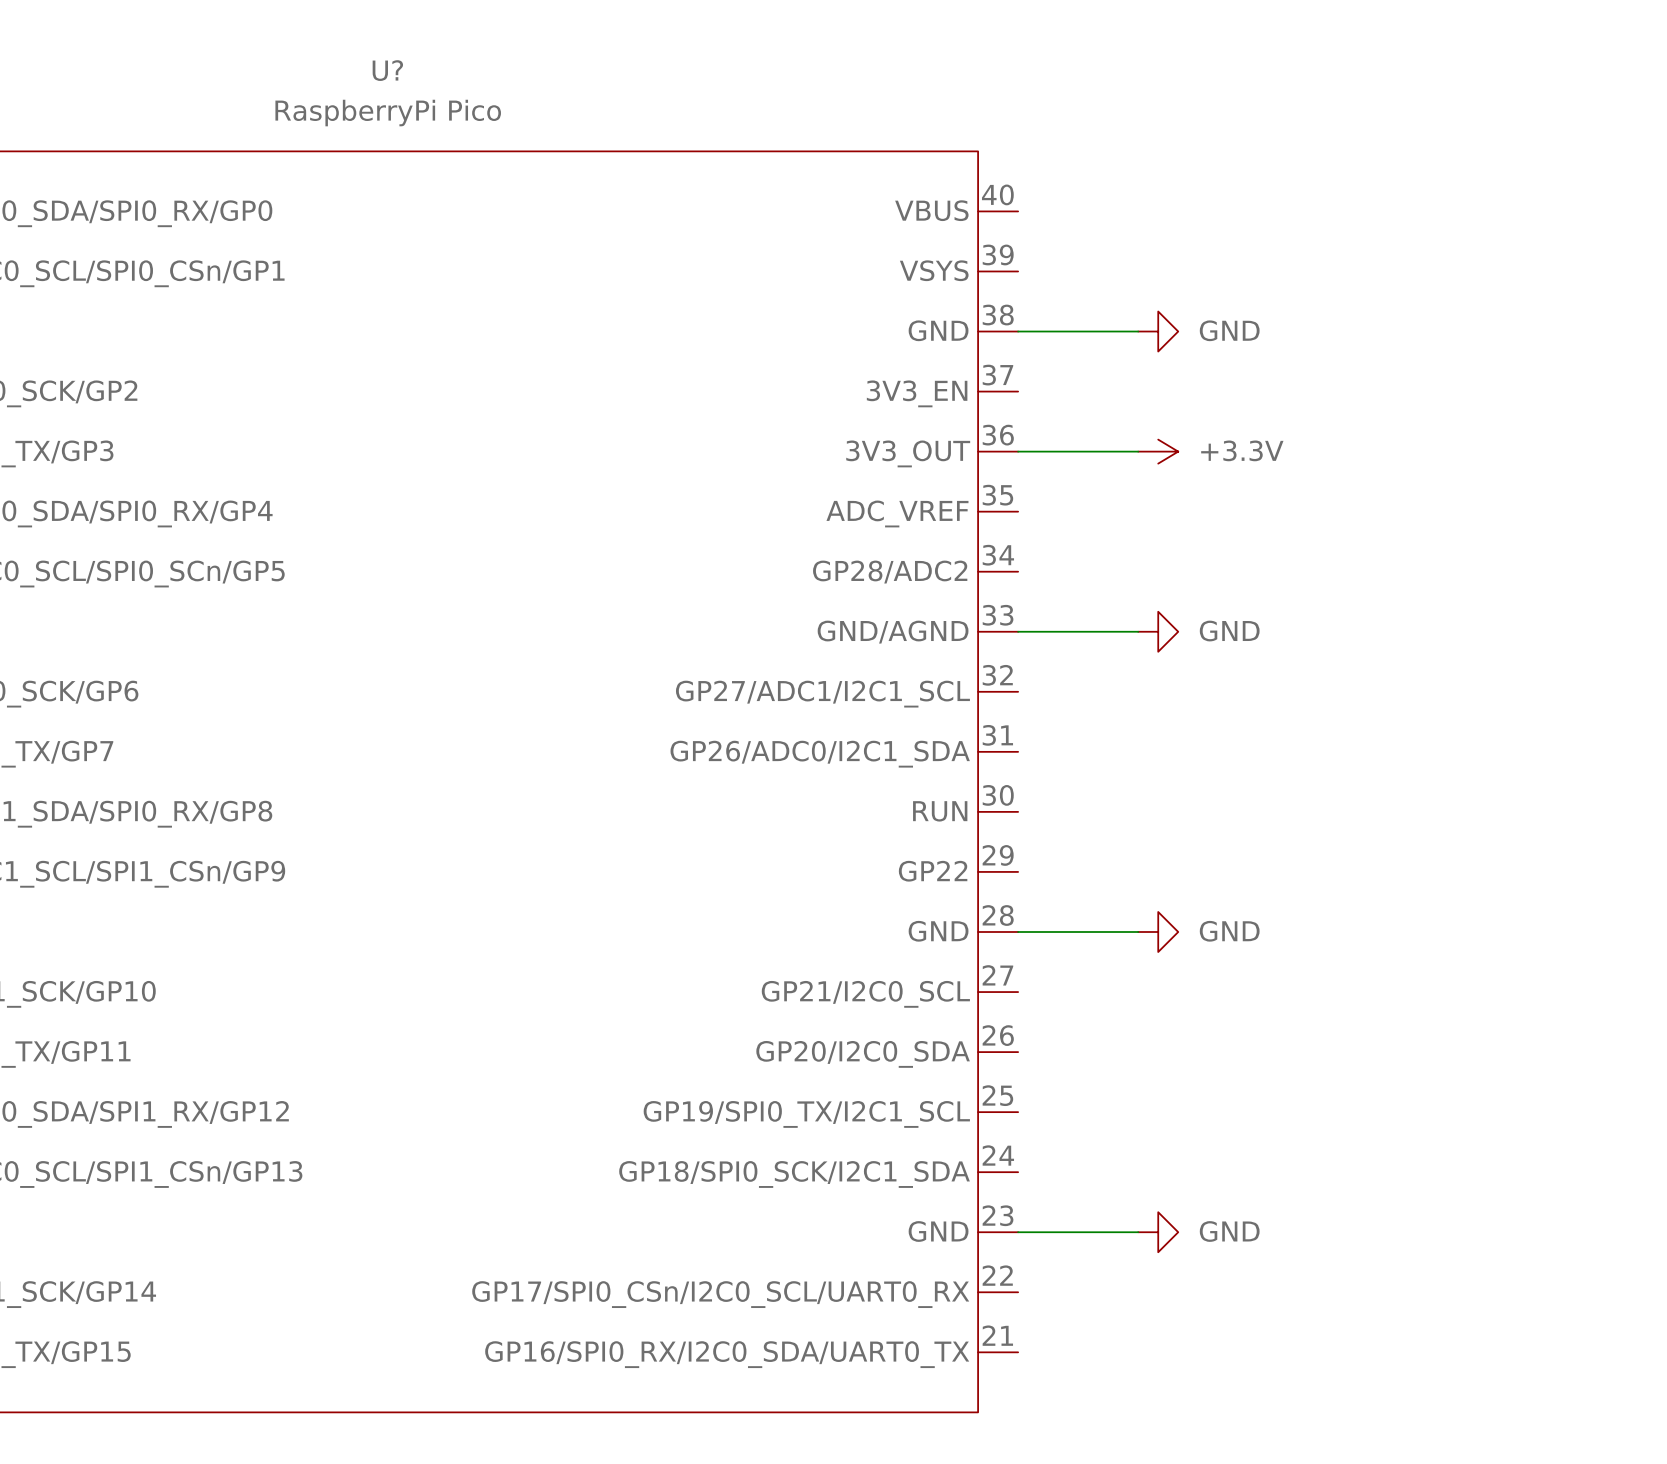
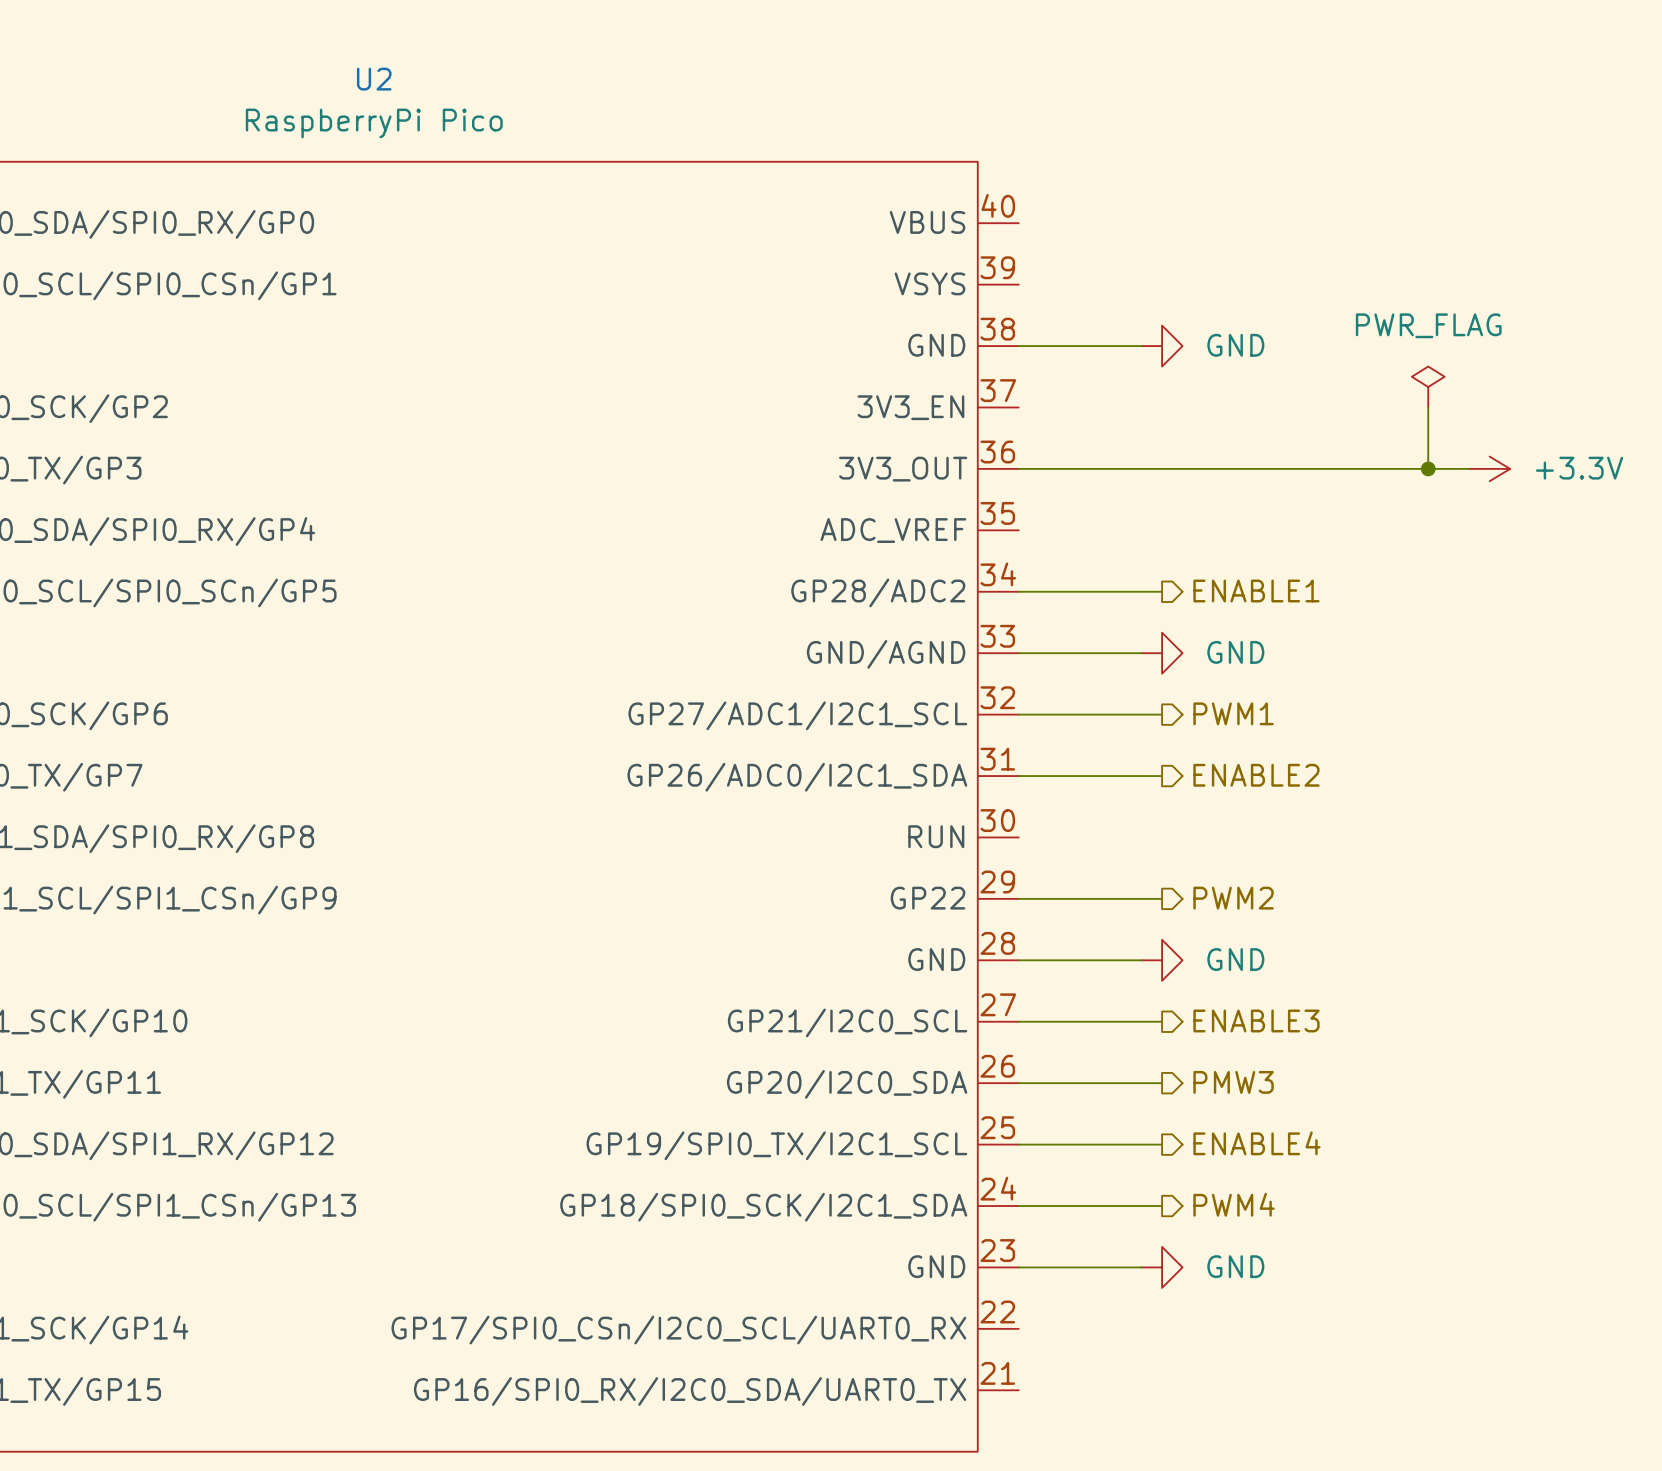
U? name: U? (387, 70) -> U2 (374, 79)
power symbol: none -> PWR_FLAG (1428, 387)
wire: none -> (1428, 407) (1428, 468)
wire: none -> (1141, 468) (1469, 468)
power symbol position: +3.3V (1158, 451) -> +3.3V (1489, 468)
junction: none -> (1428, 468)
hierarchical label: none -> ENABLE1 (1256, 590)
wire: none -> (1018, 591) (1162, 591)
wire: none -> (1018, 714) (1162, 714)
hierarchical label: none -> PWM1 (1233, 713)
hierarchical label: none -> ENABLE2 (1256, 775)
wire: none -> (1018, 776) (1162, 776)
wire: none -> (1018, 898) (1162, 898)
hierarchical label: none -> PWM2 (1233, 898)
hierarchical label: none -> ENABLE3 (1256, 1020)
wire: none -> (1018, 1021) (1162, 1021)
hierarchical label: none -> PMW3 (1233, 1082)
wire: none -> (1018, 1083) (1162, 1083)
hierarchical label: none -> ENABLE4 (1256, 1143)
wire: none -> (1018, 1144) (1162, 1144)
hierarchical label: none -> PWM4 (1234, 1204)
wire: none -> (1018, 1206) (1162, 1206)

